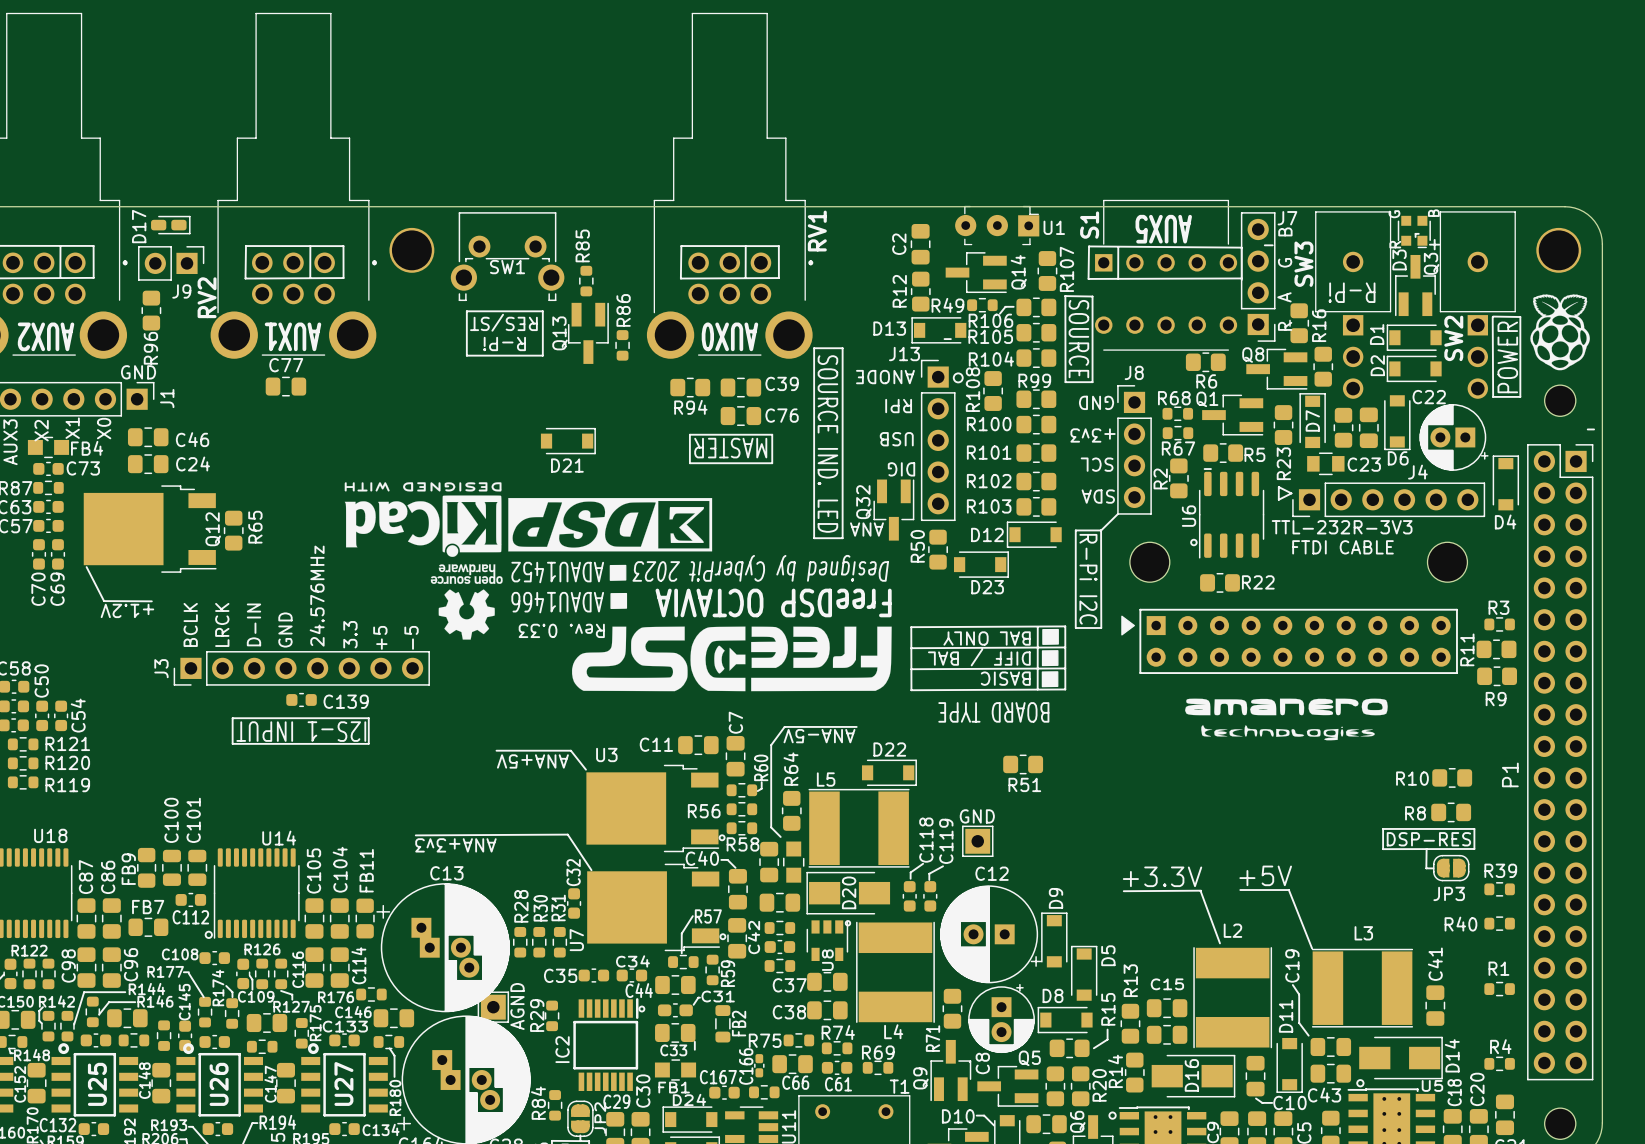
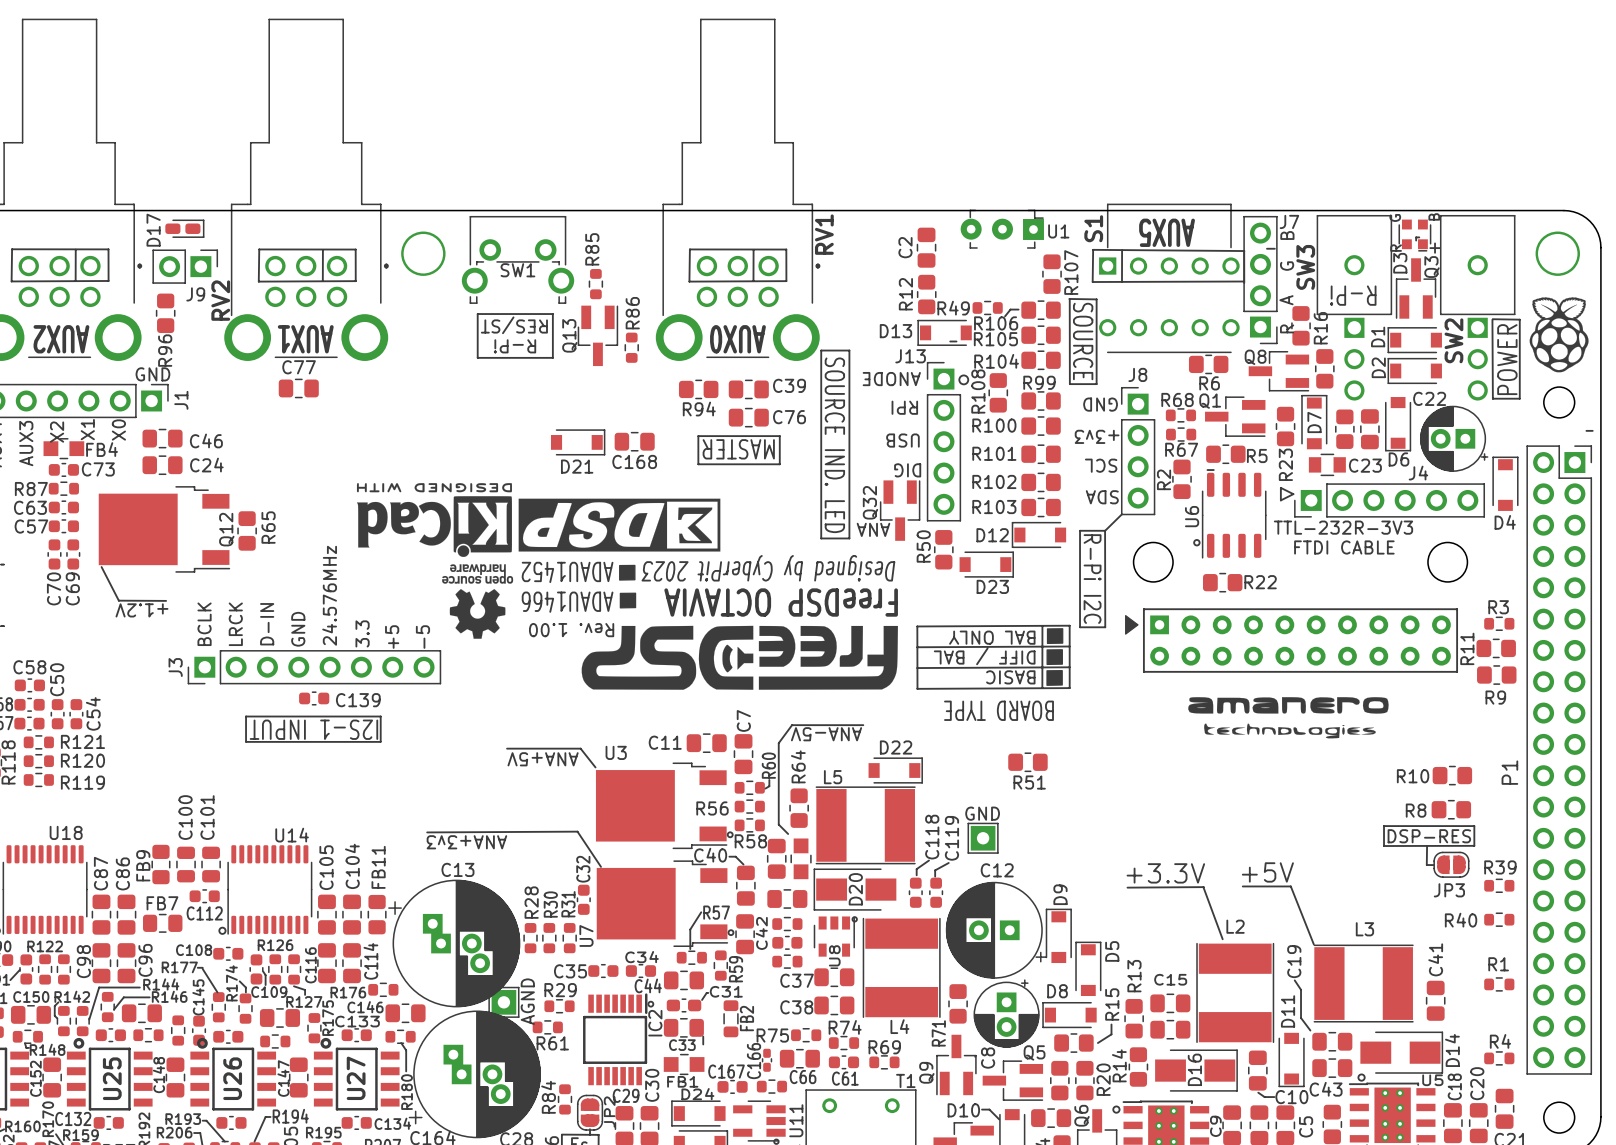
Q14: (976, 272) -> none
C168: none -> (634, 441)
text: Rev. 0.33 (561, 630) -> Rev. 1.00 (571, 630)
R29 rotation: 0° (552, 1015) -> 90° clockwise (559, 1006)
R61: none -> (547, 1027)
IC2 name position: IC2 (562, 1049) -> IC2 (655, 1023)

